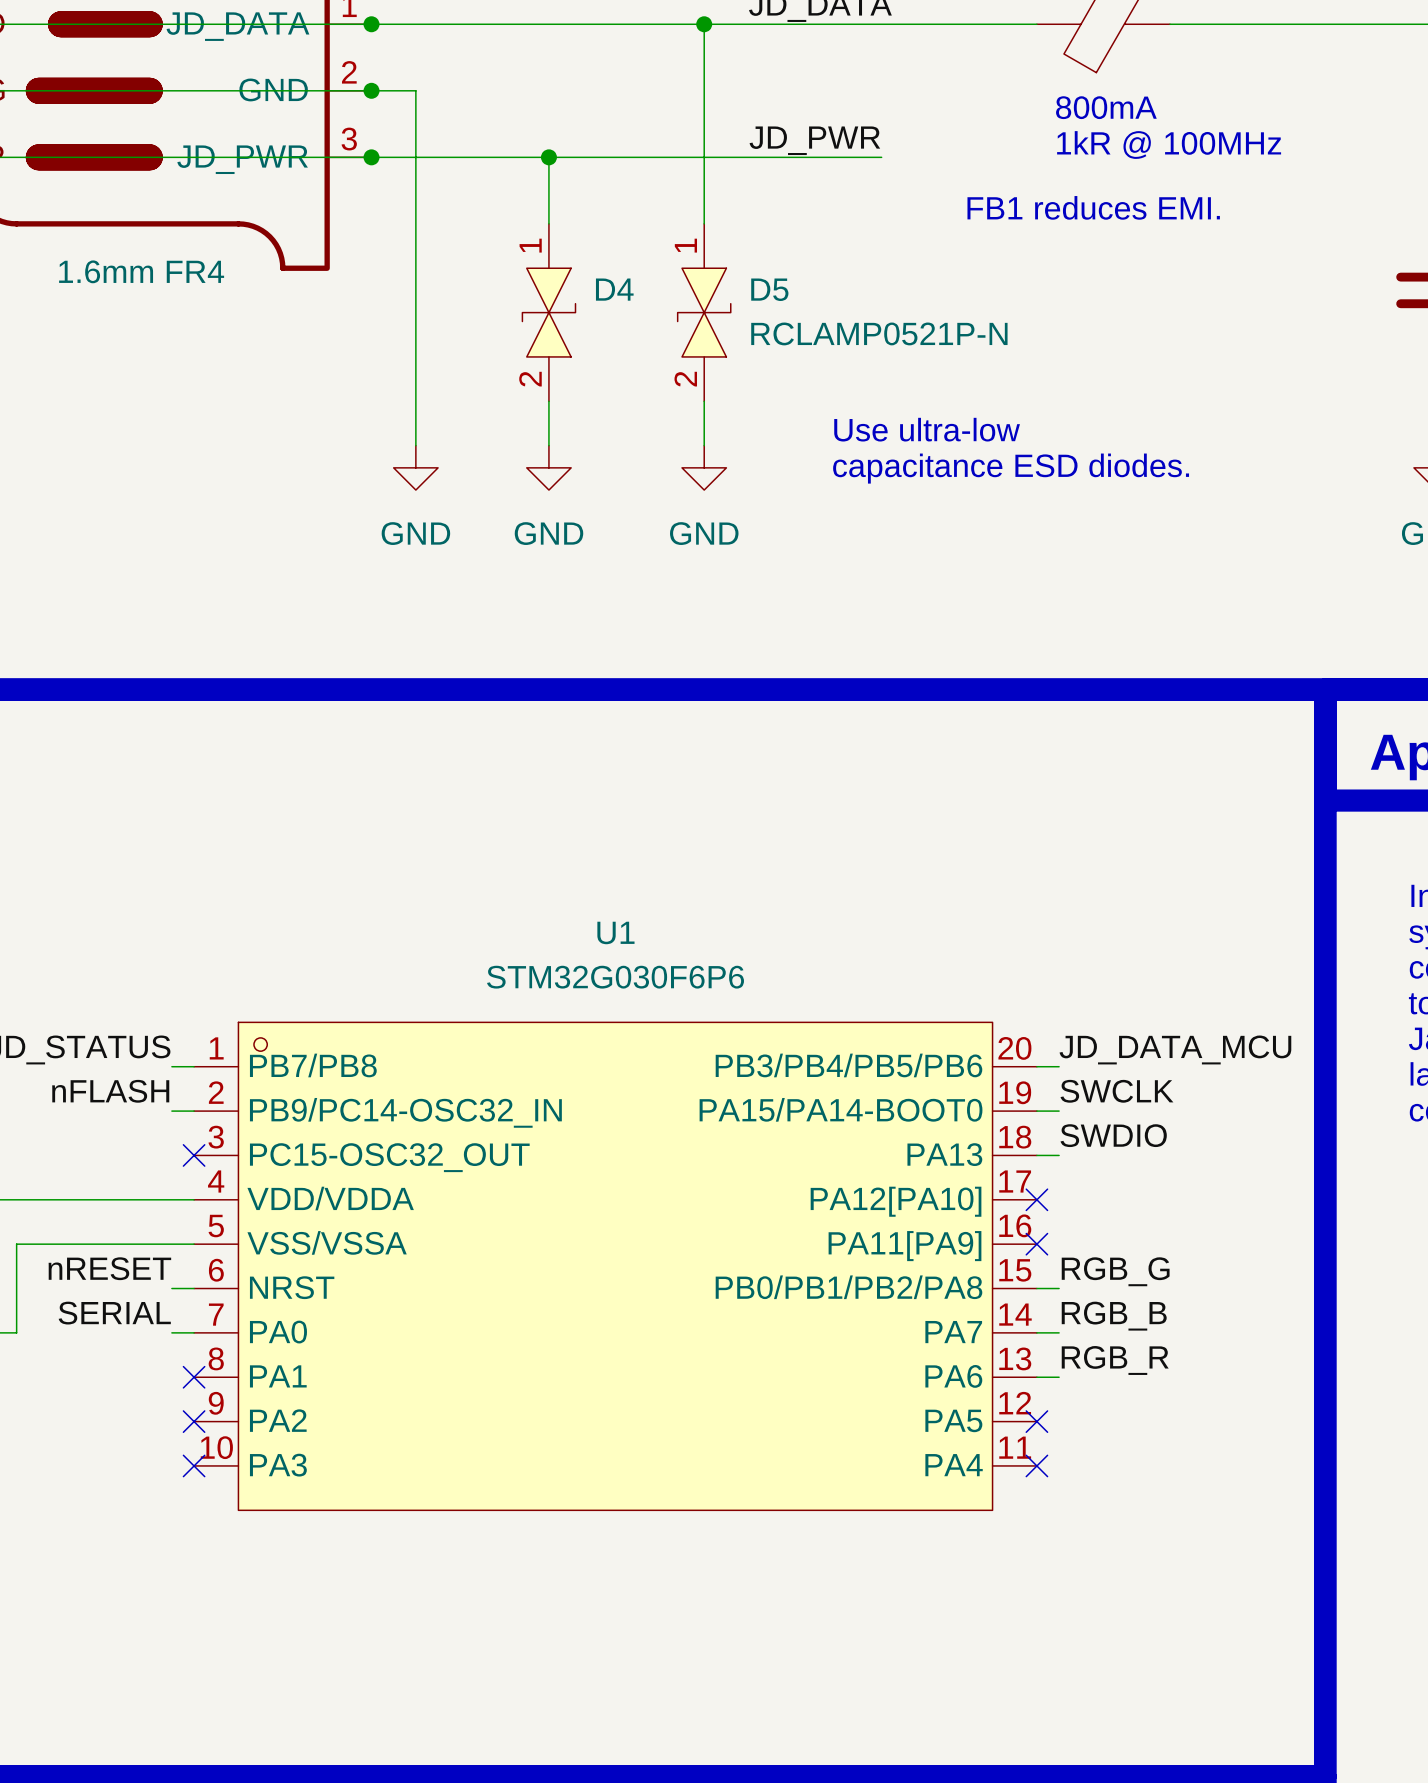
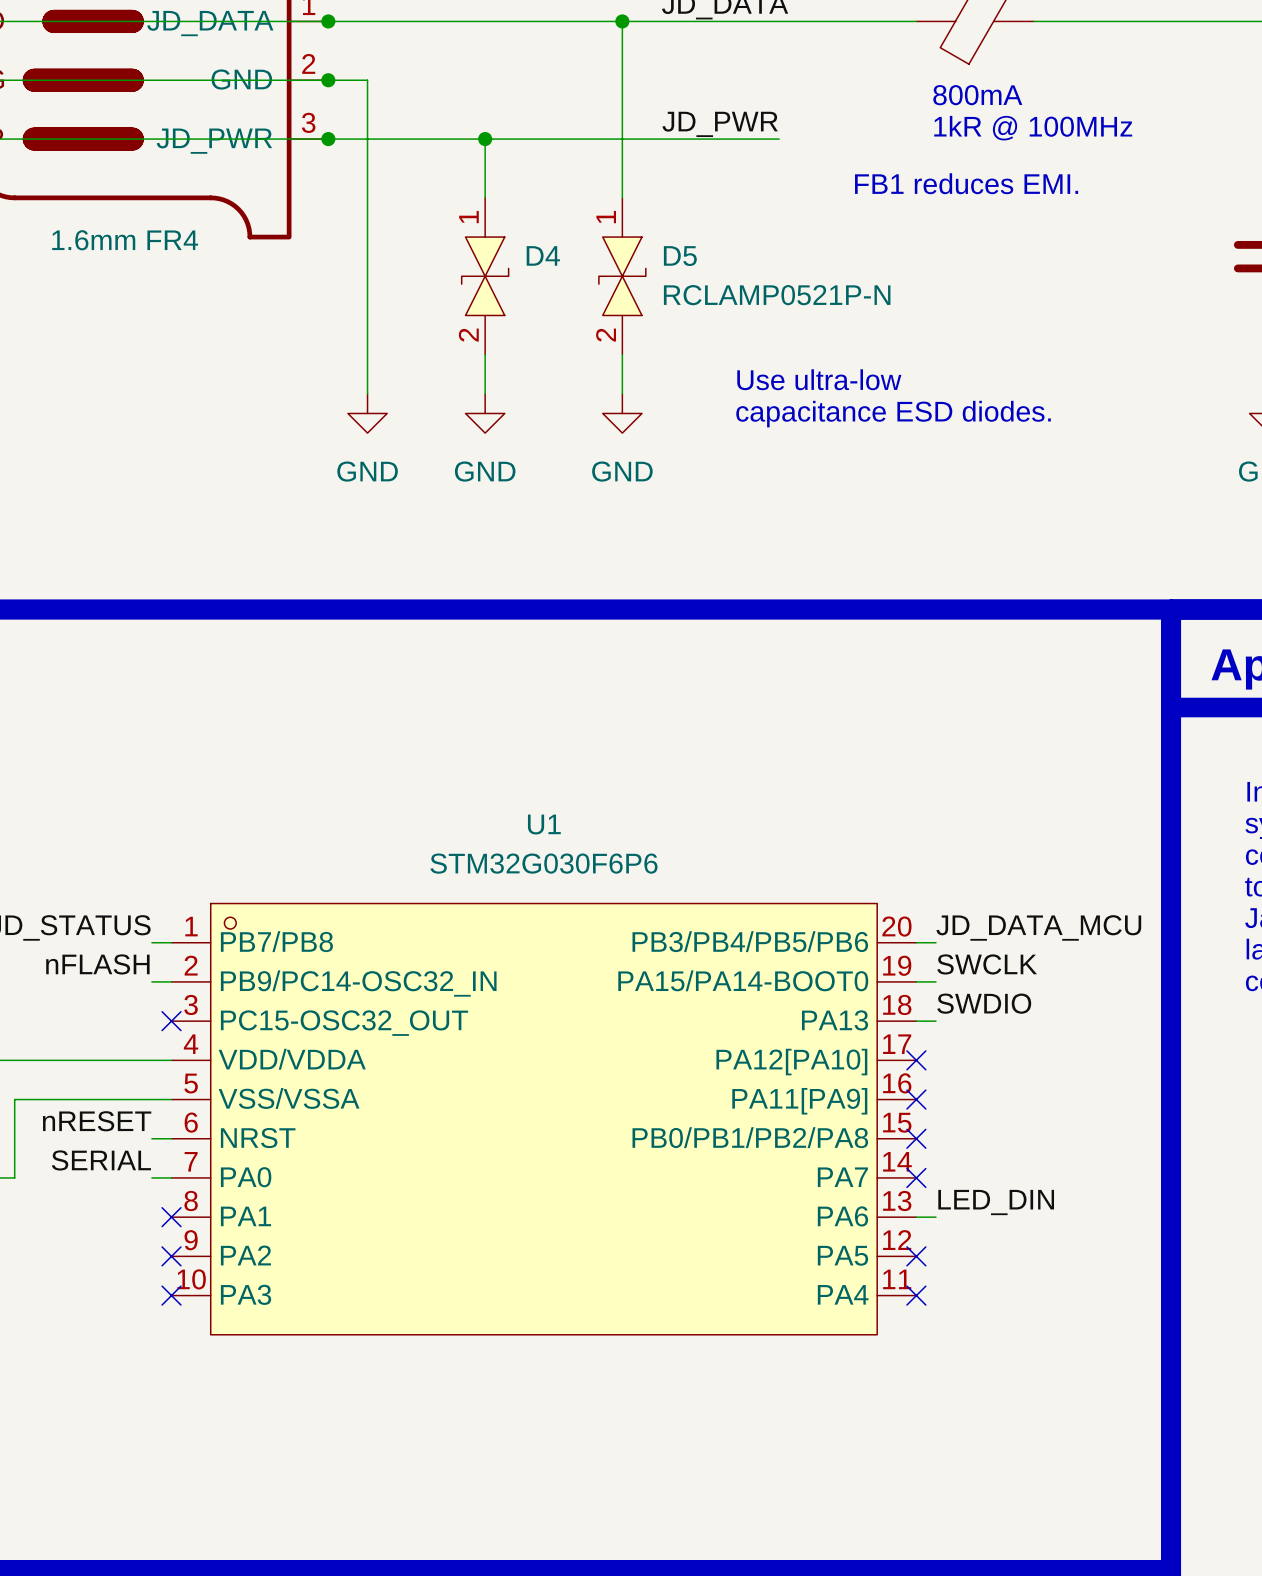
label: RGB_G (1115, 1271) -> none
wire: (1036, 1288) (1059, 1288) -> none
no-connect mark: none -> (916, 1138)
label: RGB_B (1114, 1316) -> none
wire: (1036, 1332) (1059, 1332) -> none
no-connect mark: none -> (916, 1177)
label: RGB_R (1115, 1360) -> LED_DIN (996, 1202)

